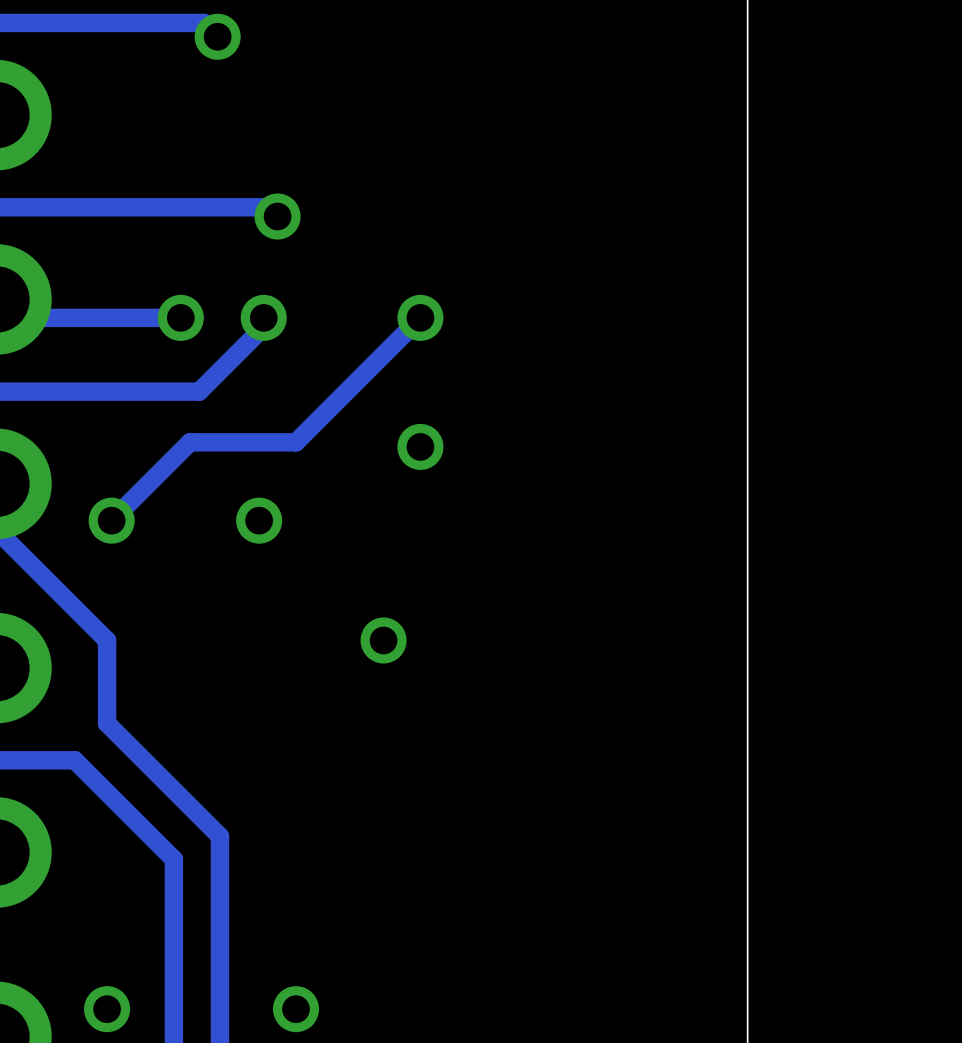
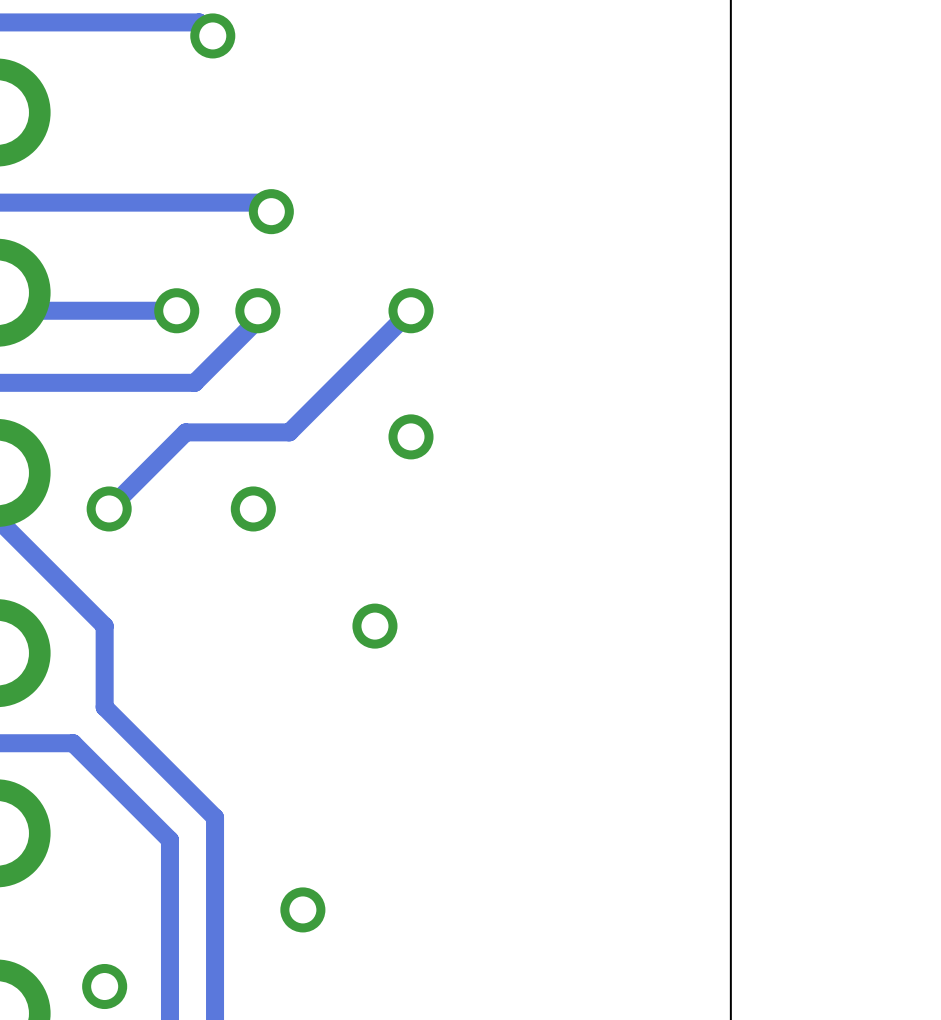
via: none -> (302, 909)
via: (296, 1009) -> none

